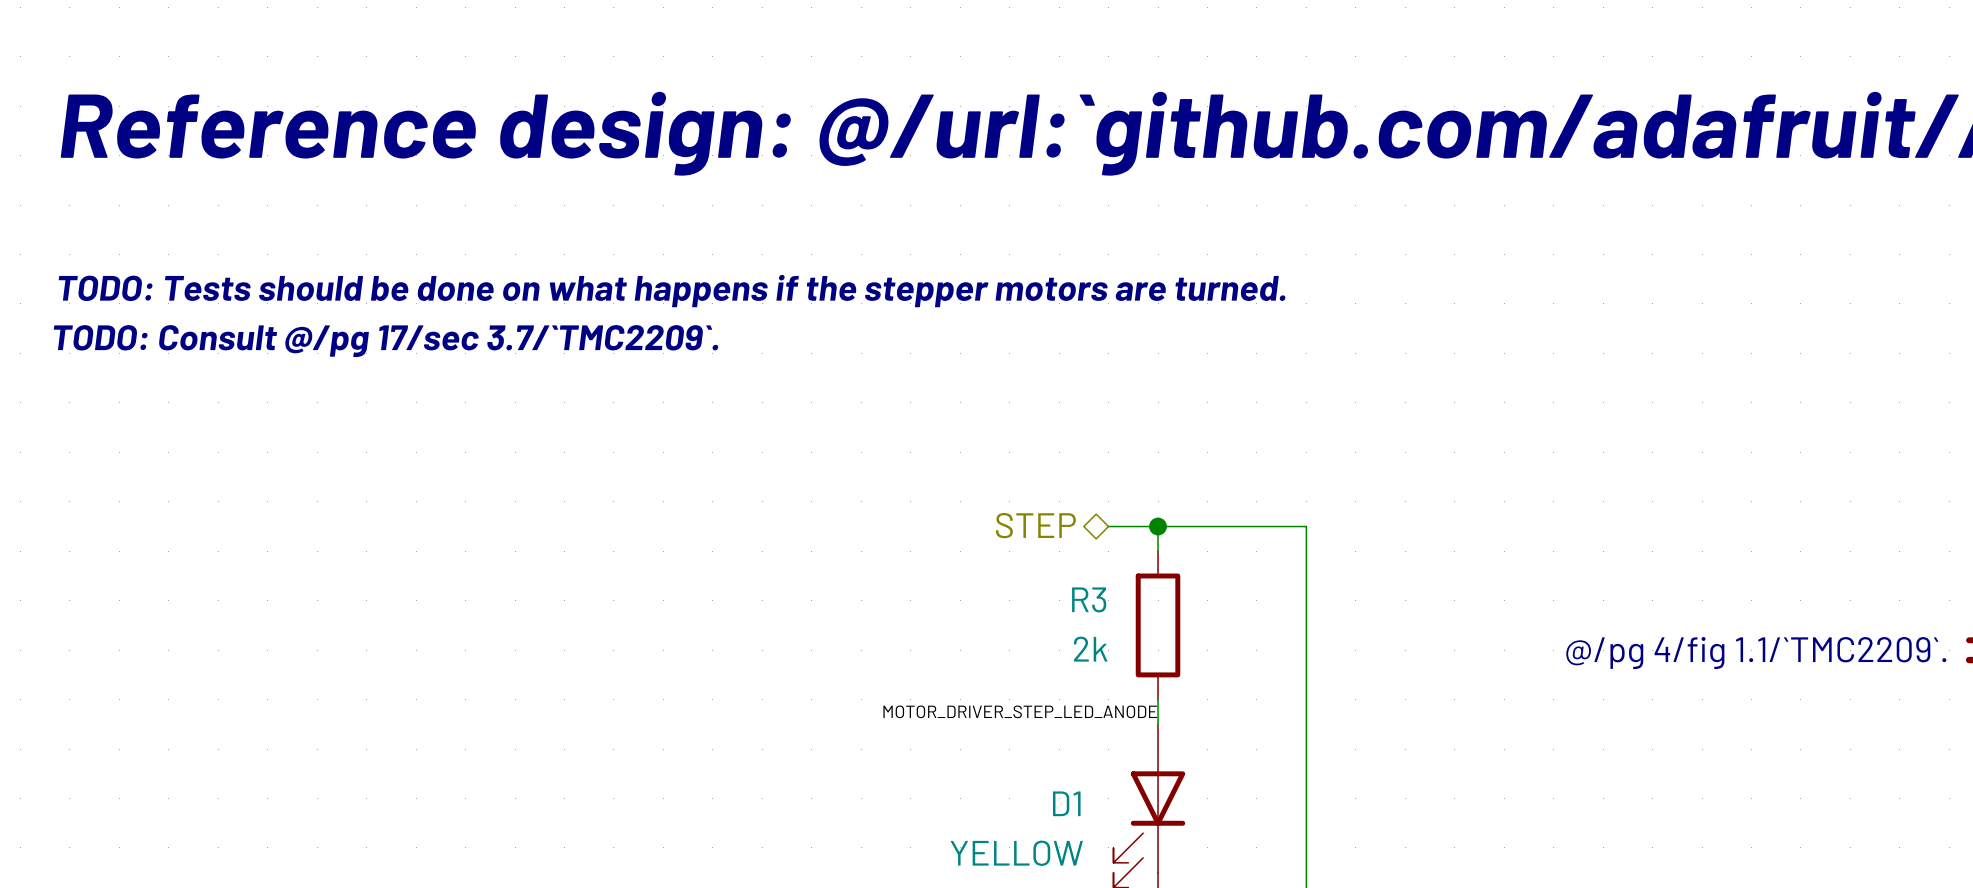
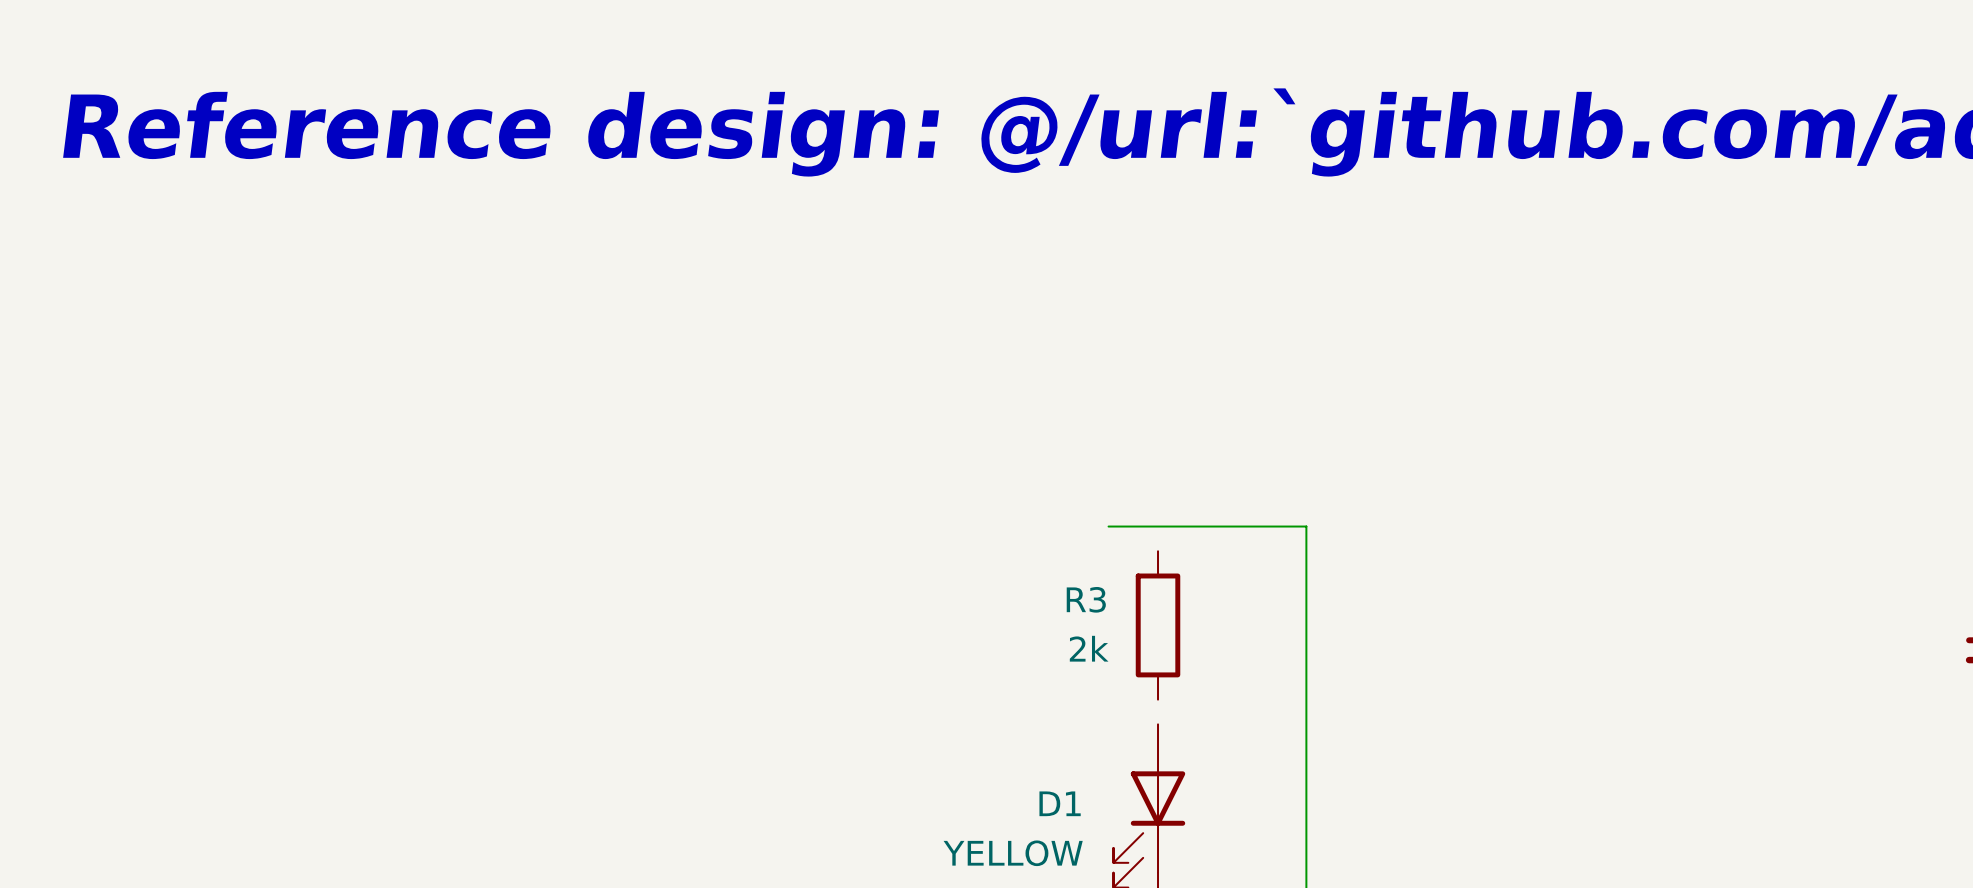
text: TODO: Tests should be done on what happens if the stepper motors are turned. (672, 291) -> none
text: TODO: Consult @/pg 17/sec 3.7/`TMC2209`. (386, 341) -> none
hierarchical label: STEP (1035, 525) -> none
wire: (1158, 526) (1158, 551) -> none
junction: (1158, 526) -> none
text: @/pg 4/fig 1.1/`TMC2209`. (1756, 653) -> none
wire: (1158, 699) (1158, 724) -> none
label: MOTOR_DRIVER_STEP_LED_ANODE (1020, 711) -> none

